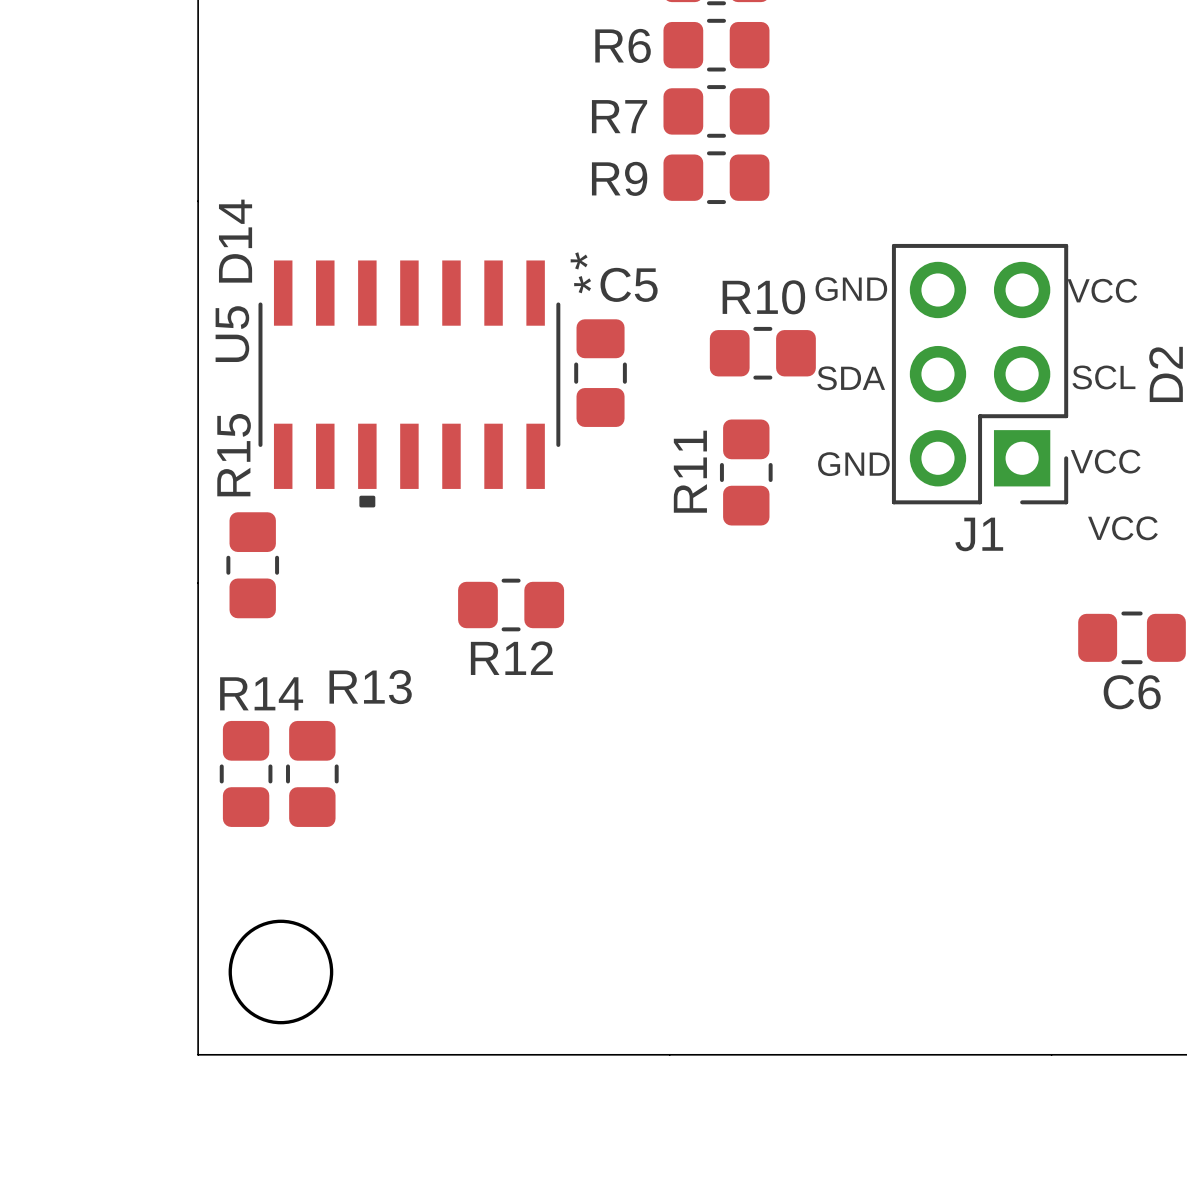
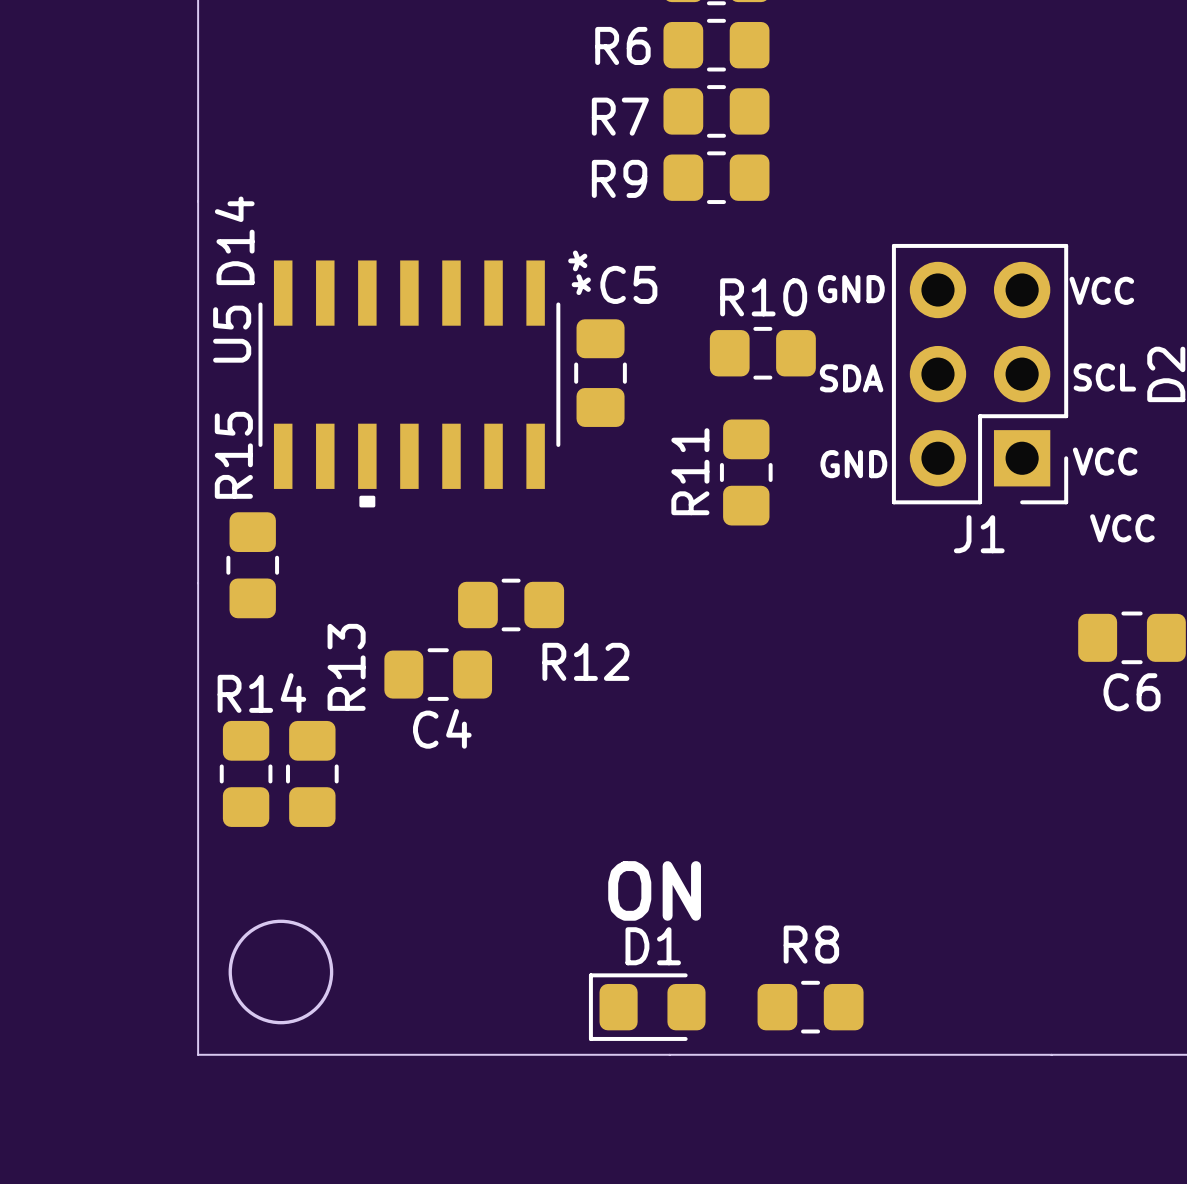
R12 name position: R12 (511, 658) -> R12 (585, 661)
C4: none -> (438, 674)
R13 name rotation: 0° (370, 687) -> 90° counterclockwise (346, 667)
text: none -> ON (654, 890)
D1: none -> (647, 1007)
R8: none -> (810, 1007)

